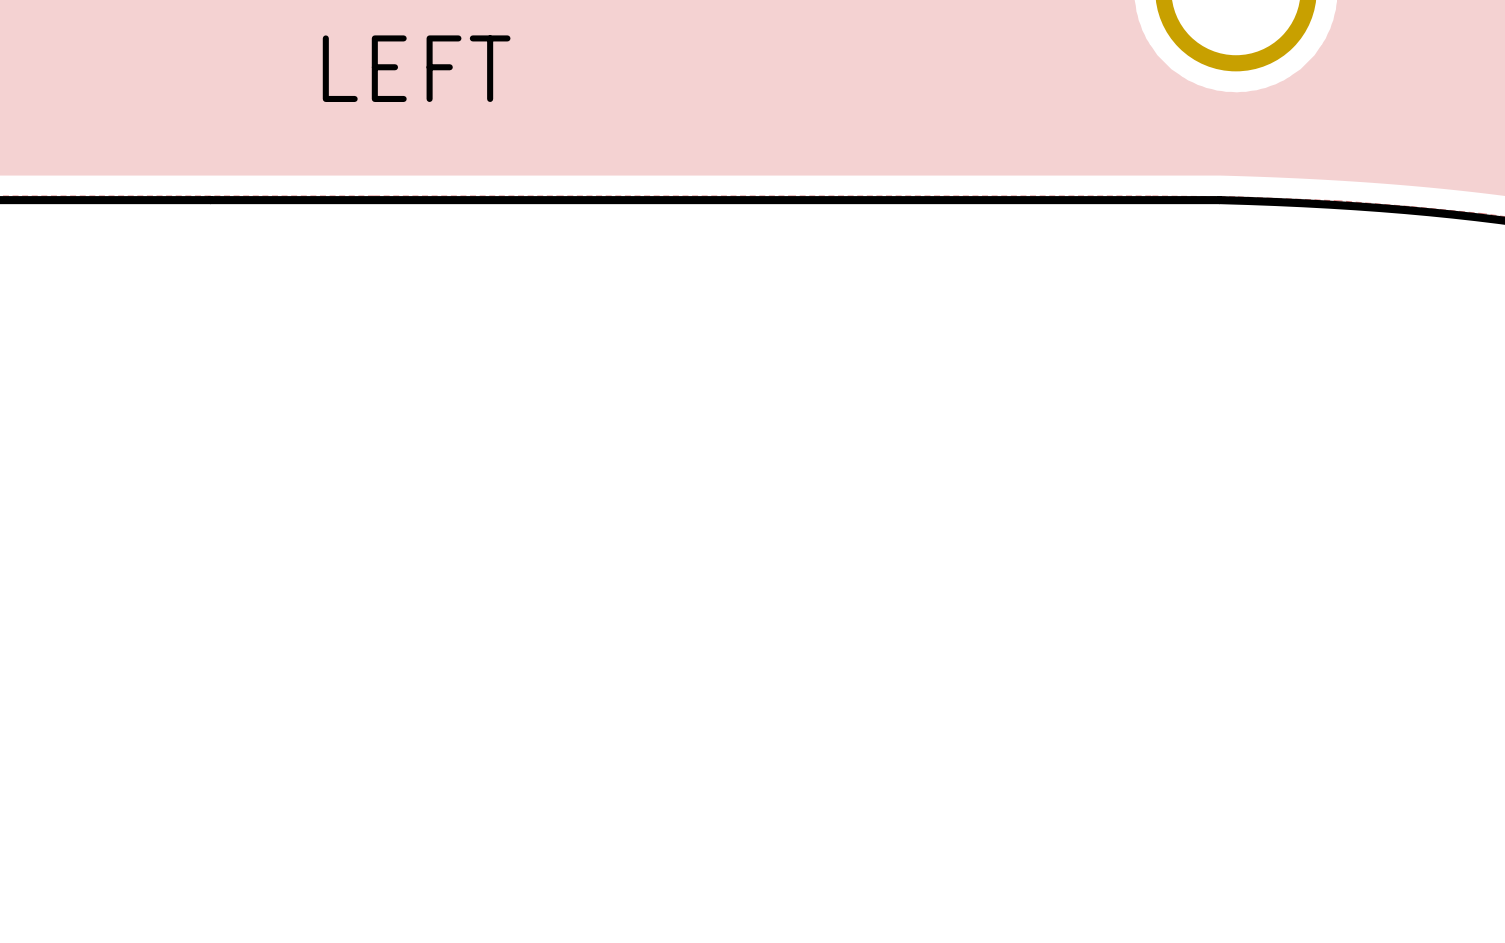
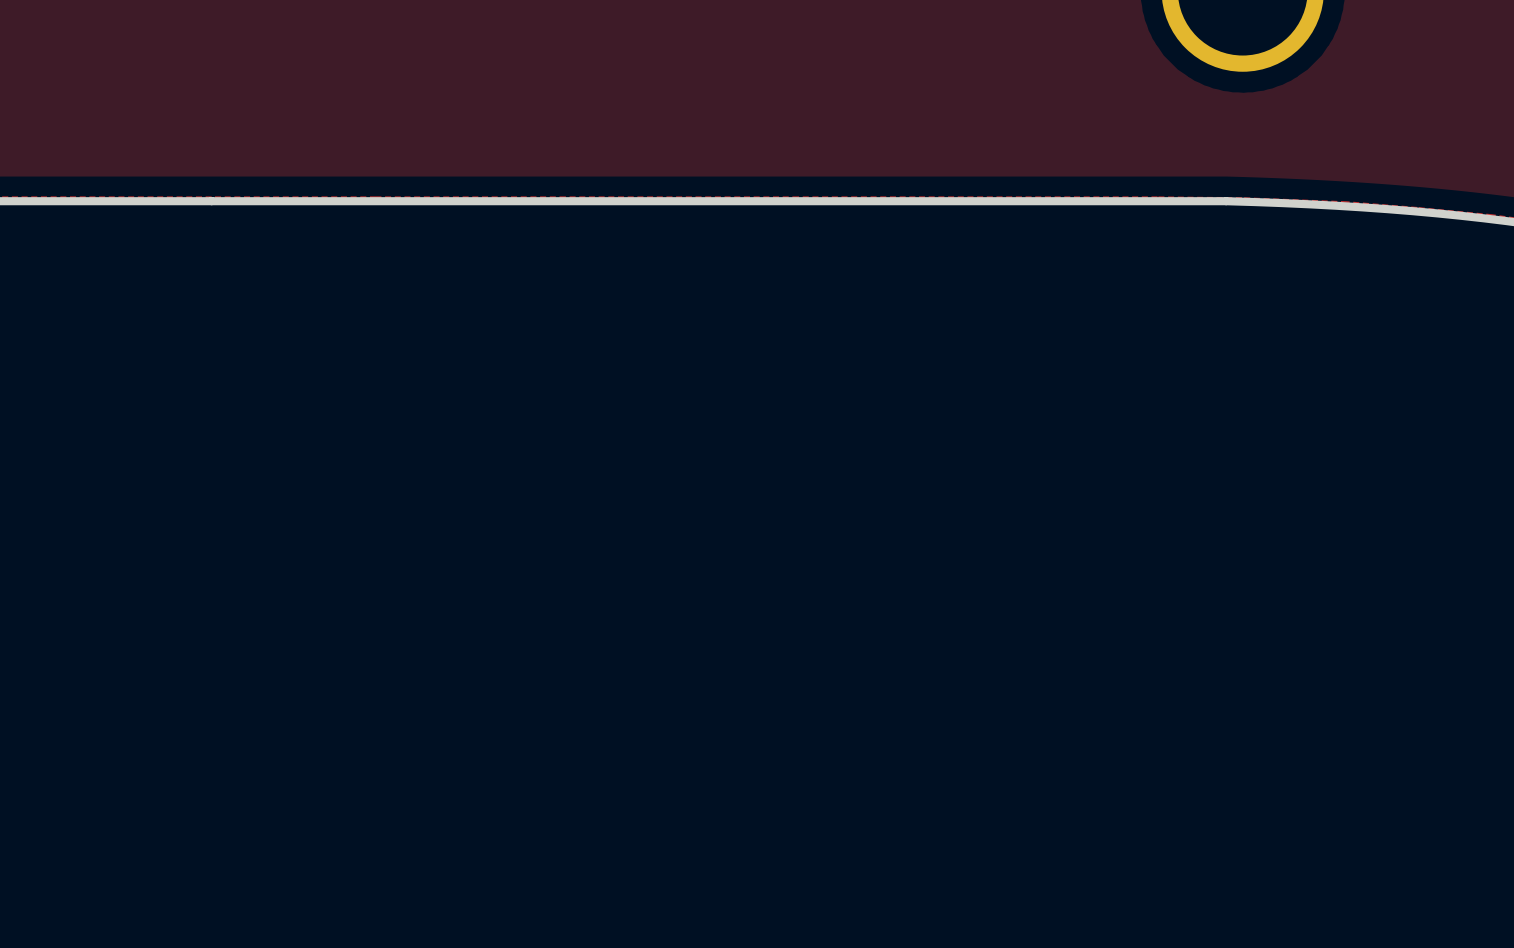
text: LEFT (416, 68) -> none

